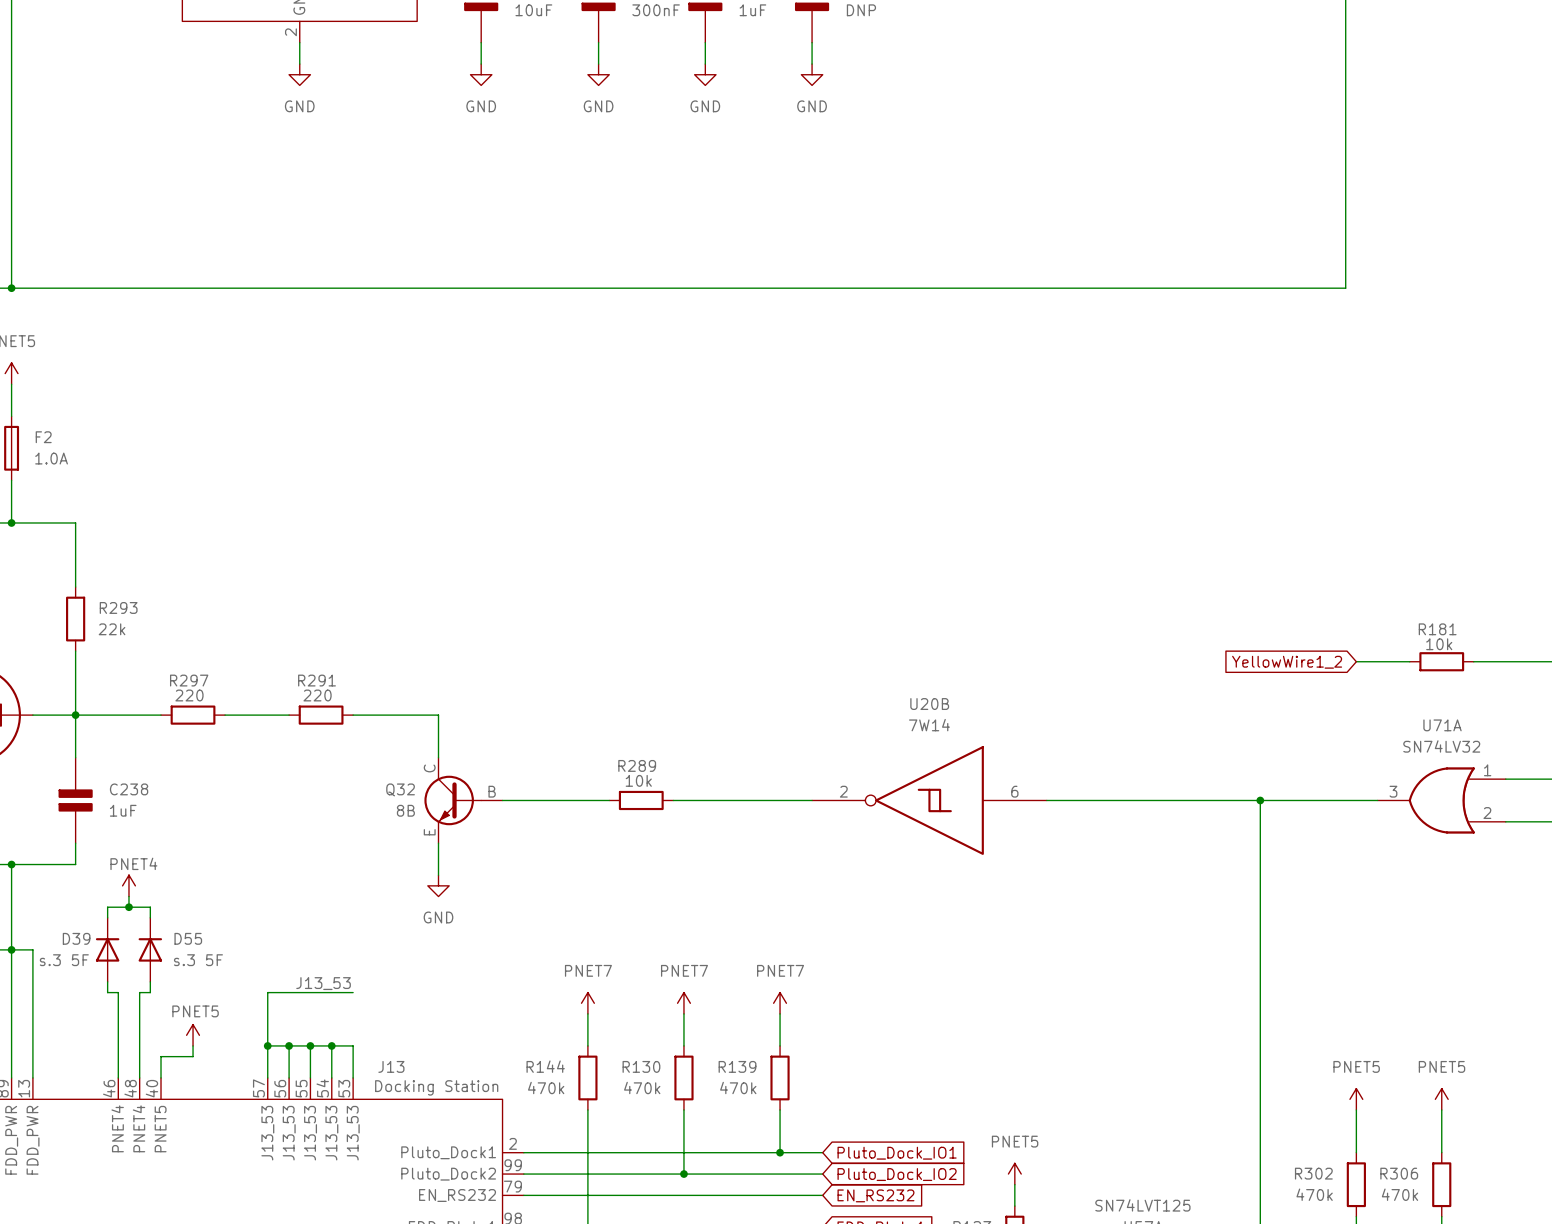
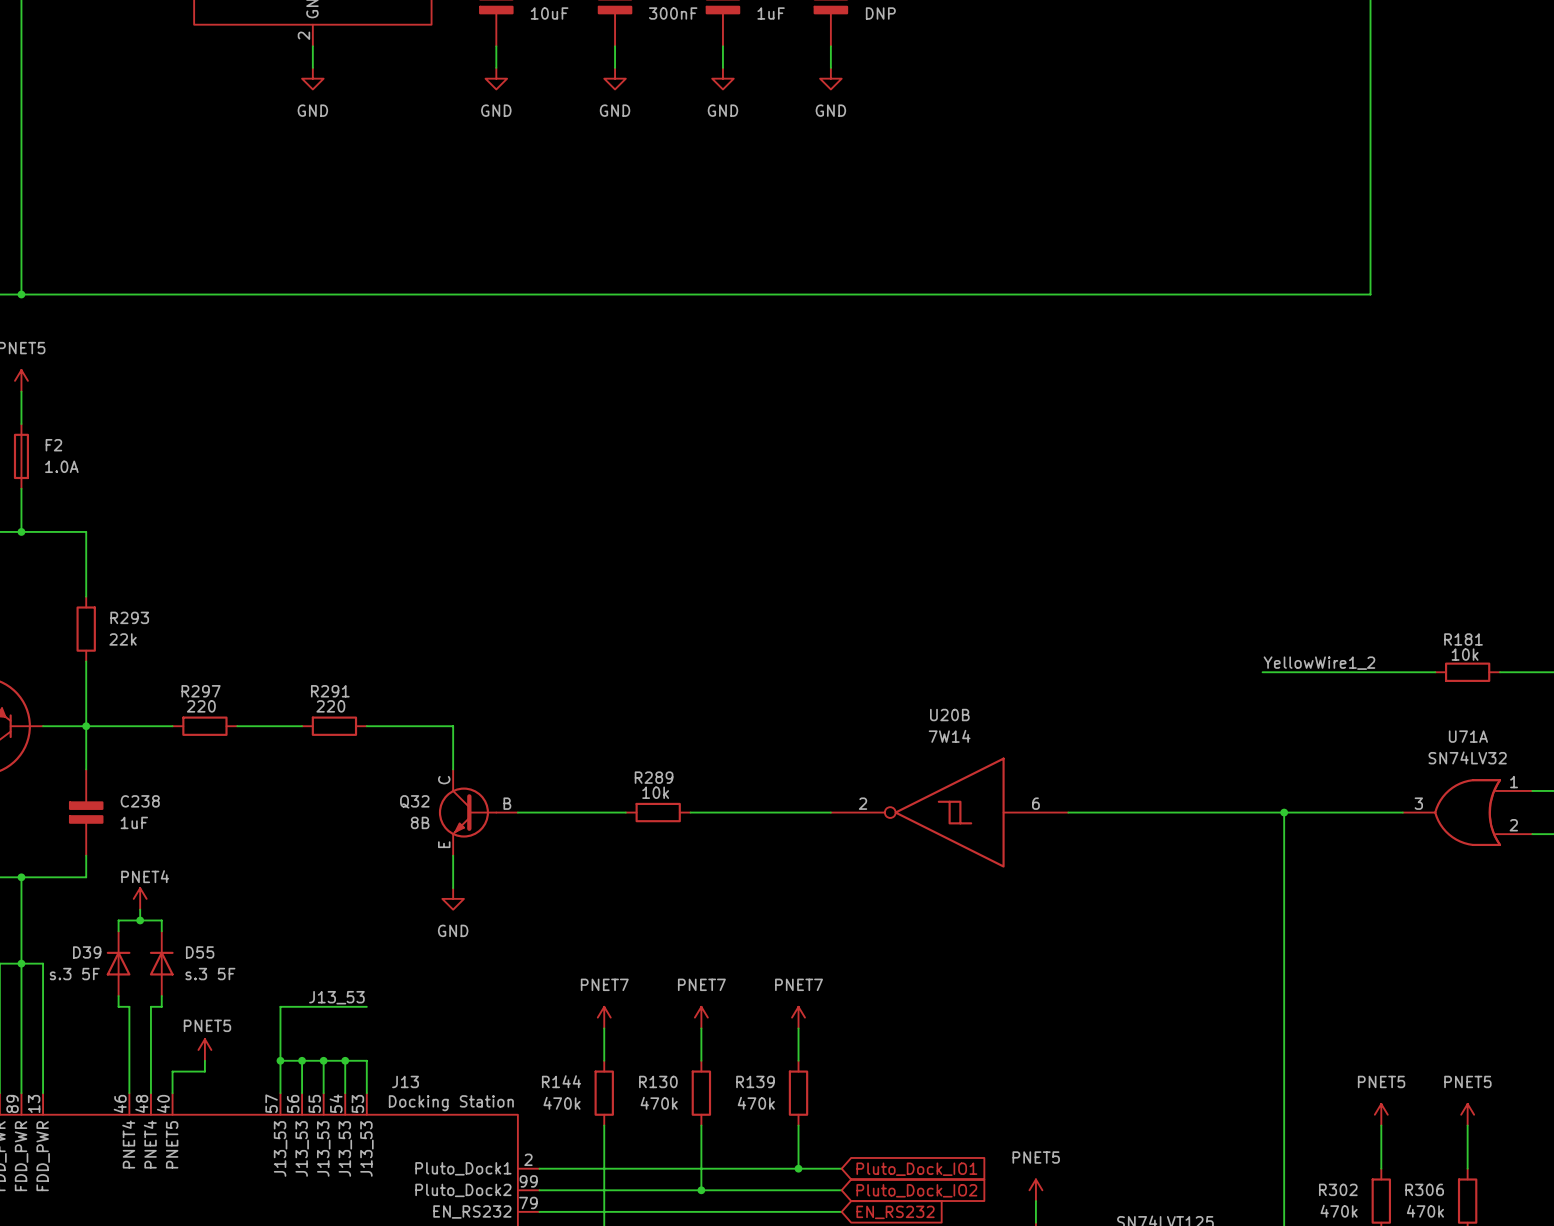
label: none -> YellowWire1_2 (1319, 663)
wire: none -> (1262, 672) (1381, 672)
global label: YellowWire1_2 (1287, 662) -> none

